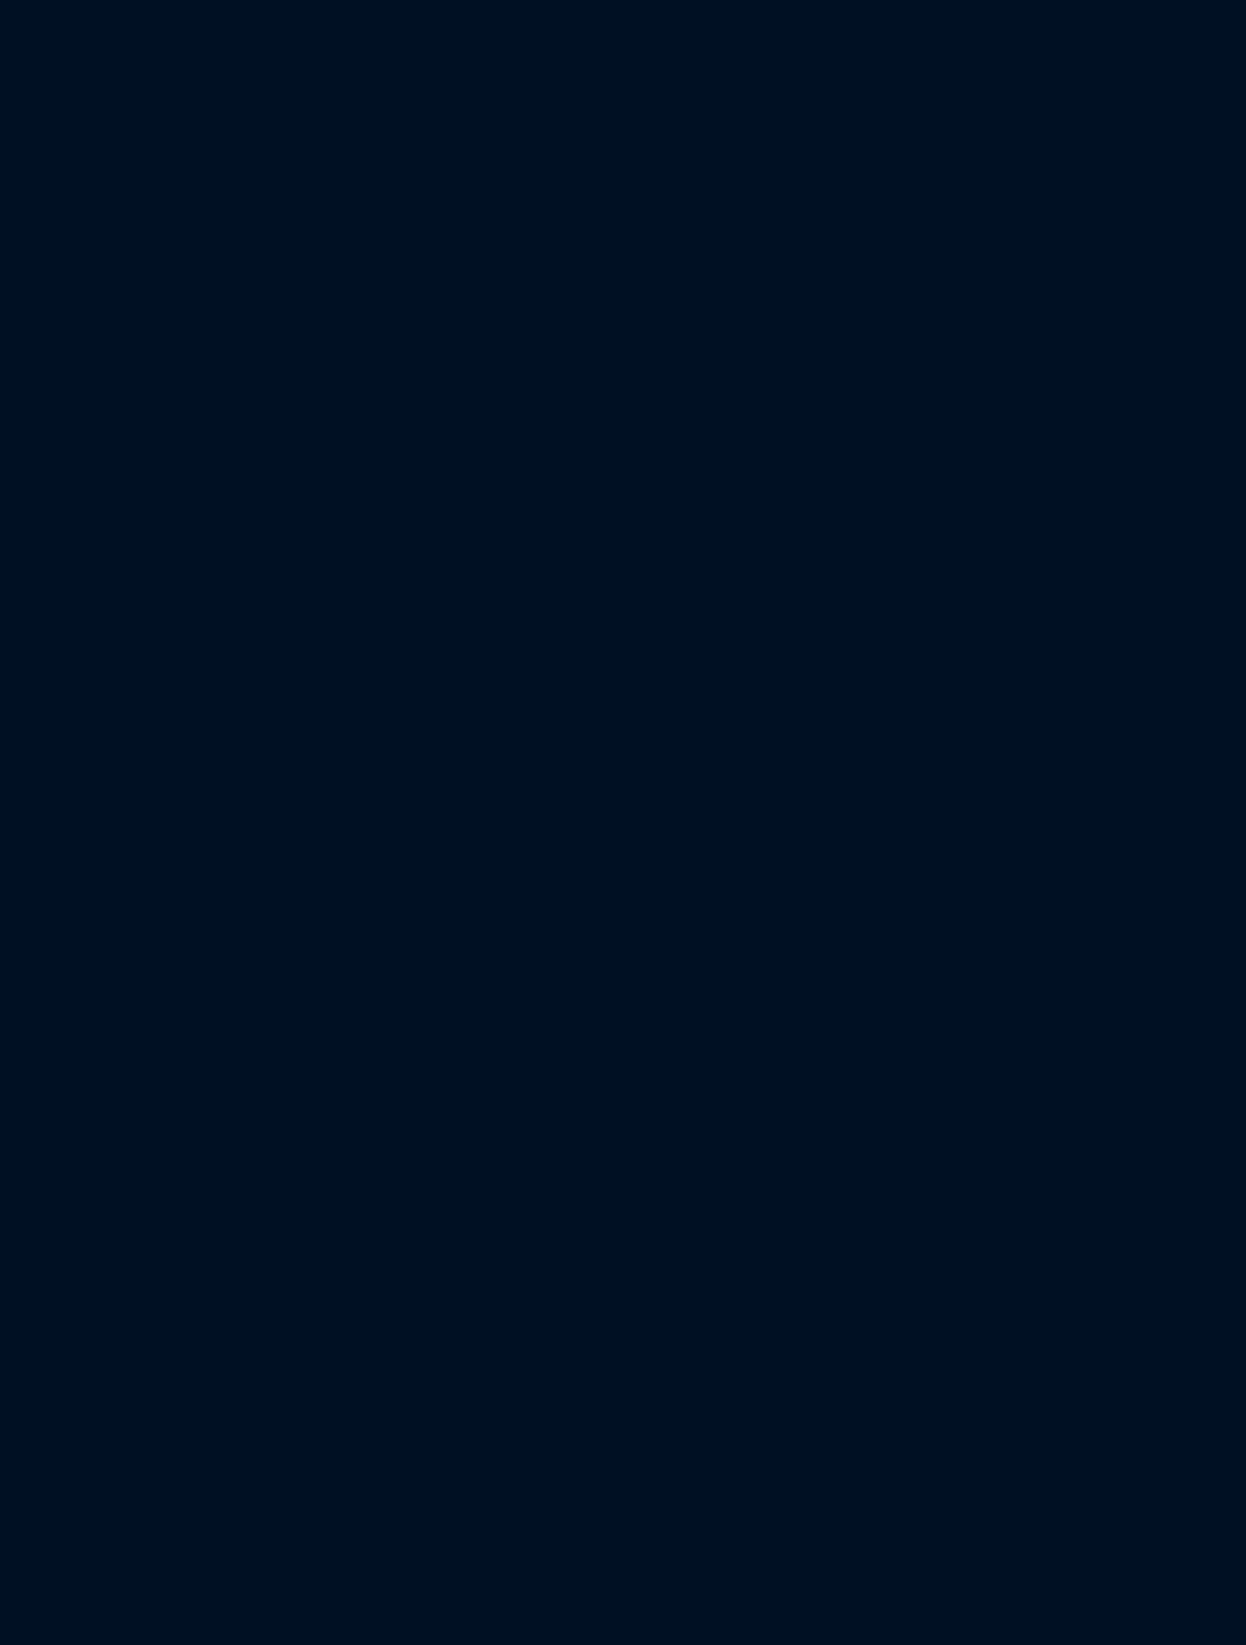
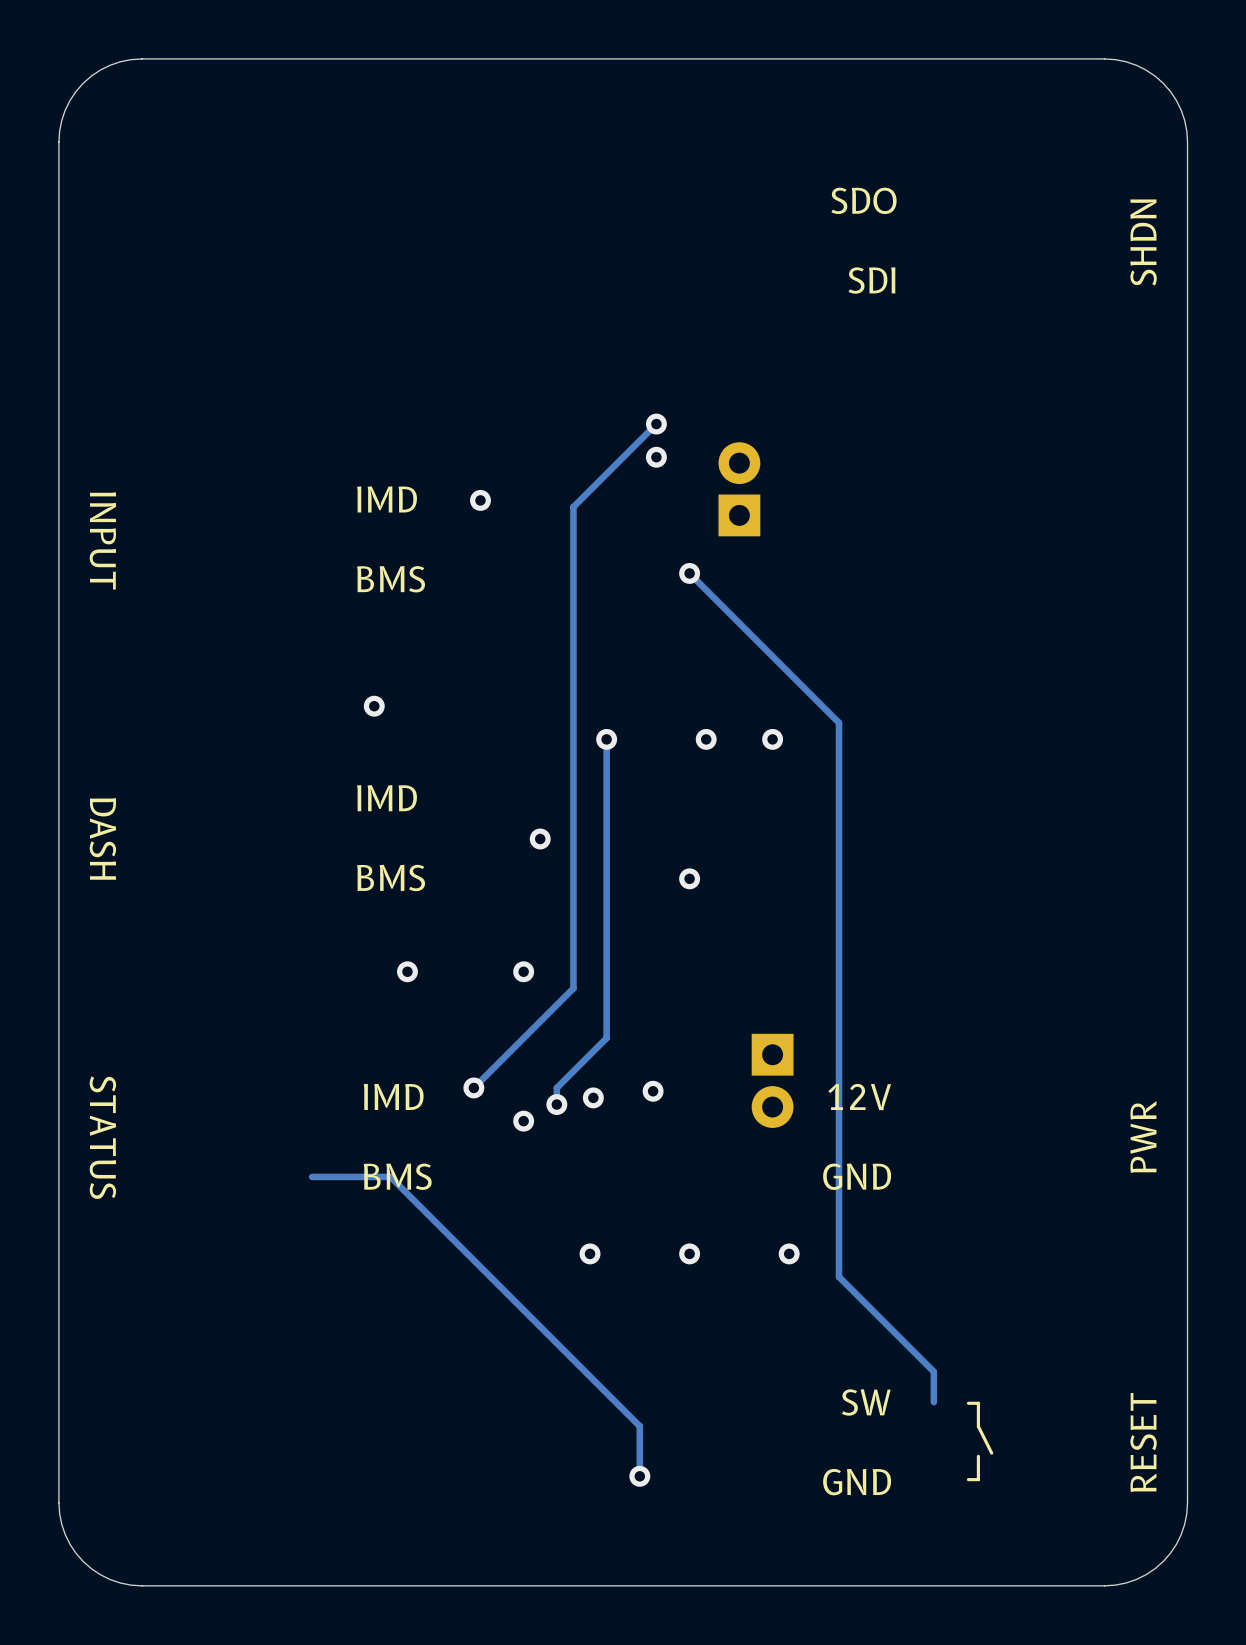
board edge: none -> (1104, 58) (141, 58) (120, 61) (100, 70) (83, 83) (70, 100) (61, 120) (58, 141) (58, 1502) (61, 1524) (70, 1544) (83, 1561) (100, 1574) (120, 1583) (141, 1585) (1104, 1585) (1126, 1583) (1146, 1574) (1163, 1561) (1176, 1544) (1184, 1524) (1187, 1502) (1187, 141) (1181, 110) (1163, 83) (1136, 65) (1104, 58)
text: none -> SDO (863, 200)
text: none -> SHDN (1143, 242)
text: none -> SDI (871, 280)
track: none -> (656, 424) (573, 507) (573, 988) (473, 1087)
via: none -> (656, 424)
via: none -> (656, 457)
part: none -> (739, 489)
text: none -> IMD (387, 499)
via: none -> (480, 500)
text: none -> INPUT (102, 540)
track: none -> (689, 573) (838, 722) (838, 1276) (933, 1371) (933, 1402)
via: none -> (689, 573)
text: none -> BMS (391, 579)
via: none -> (374, 706)
track: none -> (606, 739) (606, 1038) (556, 1087) (556, 1104)
via: none -> (606, 739)
via: none -> (706, 739)
via: none -> (772, 739)
text: none -> IMD (387, 798)
text: none -> DASH (102, 838)
via: none -> (540, 838)
text: none -> BMS (391, 877)
via: none -> (689, 878)
via: none -> (407, 971)
via: none -> (523, 971)
part: none -> (772, 1080)
via: none -> (473, 1087)
via: none -> (653, 1091)
text: none -> IMD (393, 1096)
text: none -> 12V (859, 1097)
via: none -> (593, 1097)
via: none -> (556, 1104)
via: none -> (523, 1121)
text: none -> STATUS (102, 1137)
text: none -> PWR (1143, 1136)
track: none -> (312, 1176) (390, 1176) (639, 1426) (639, 1476)
text: none -> BMS (397, 1176)
text: none -> GND (857, 1176)
via: none -> (590, 1253)
via: none -> (689, 1253)
via: none -> (789, 1253)
text: none -> SW (866, 1402)
line: none -> (968, 1403) (978, 1403) (978, 1426) (991, 1453)
text: none -> RESET (1143, 1442)
line: none -> (978, 1456) (978, 1479) (968, 1479)
via: none -> (639, 1476)
text: none -> GND (857, 1482)

